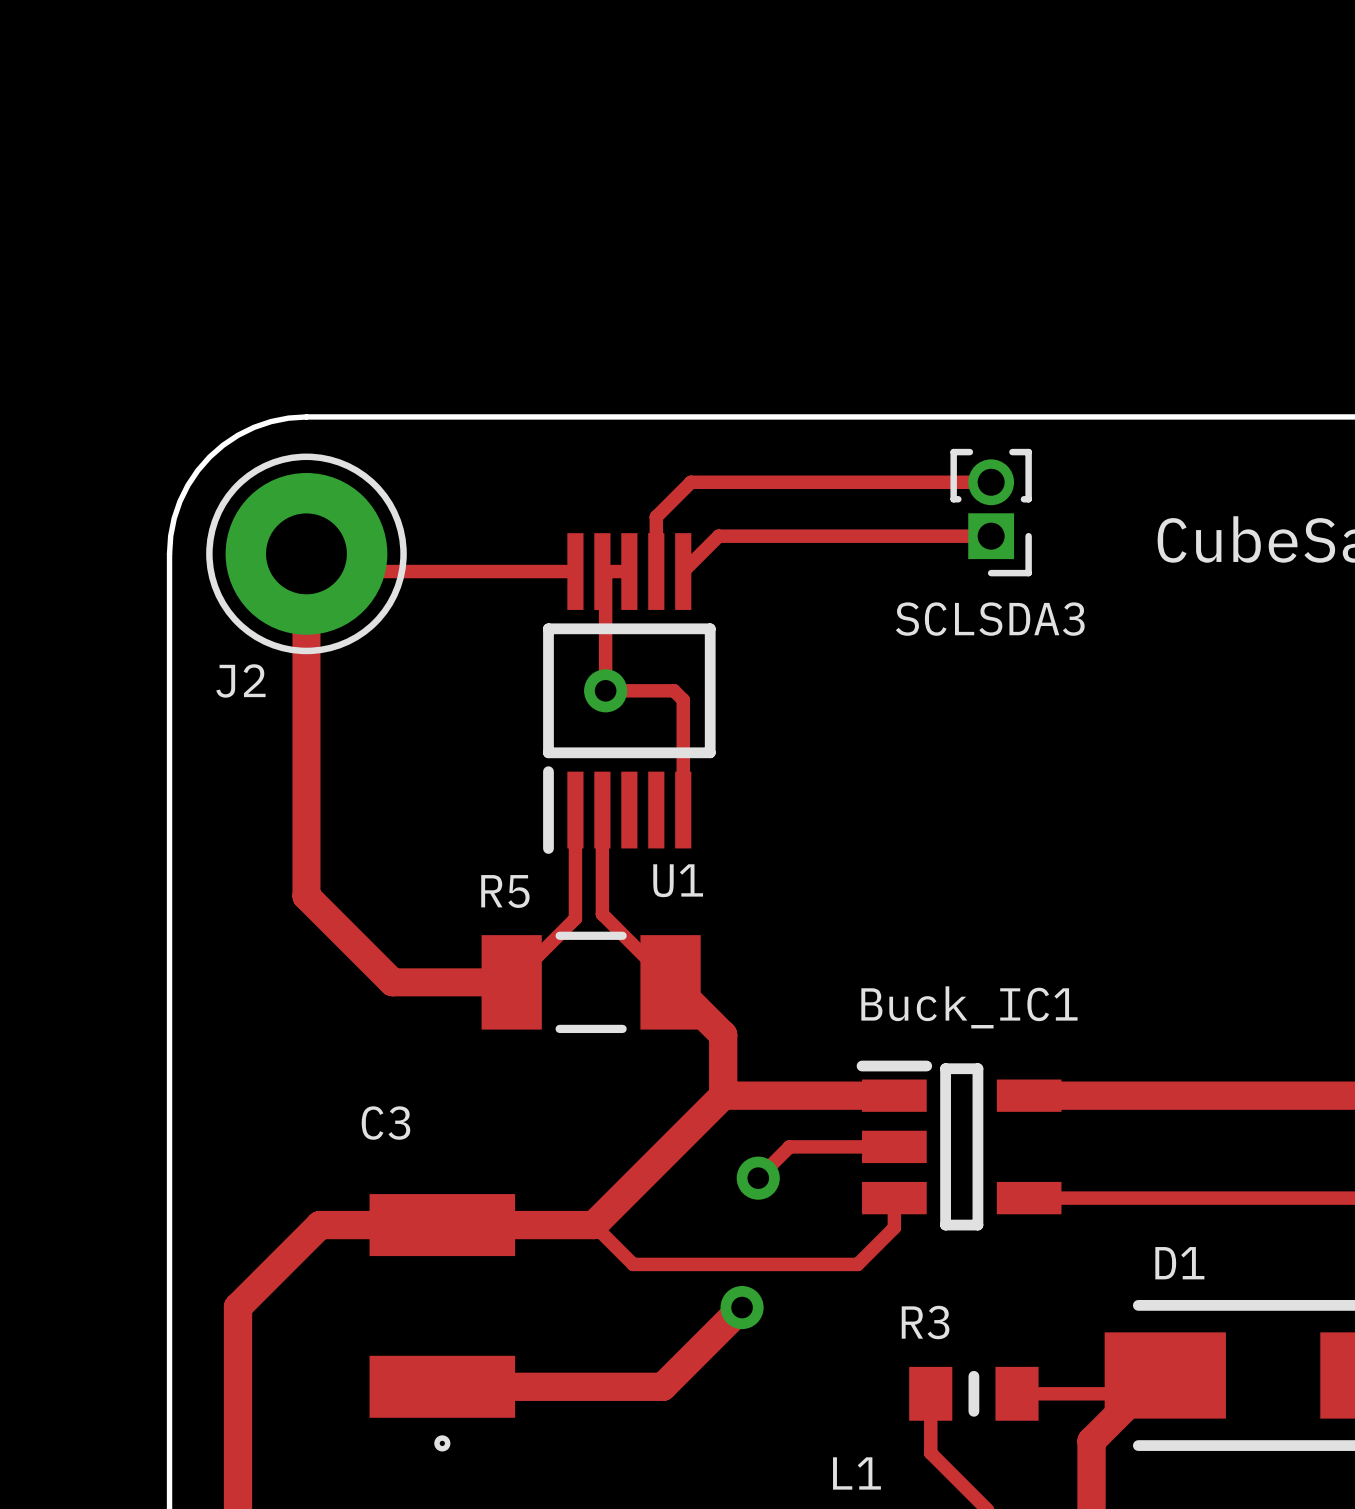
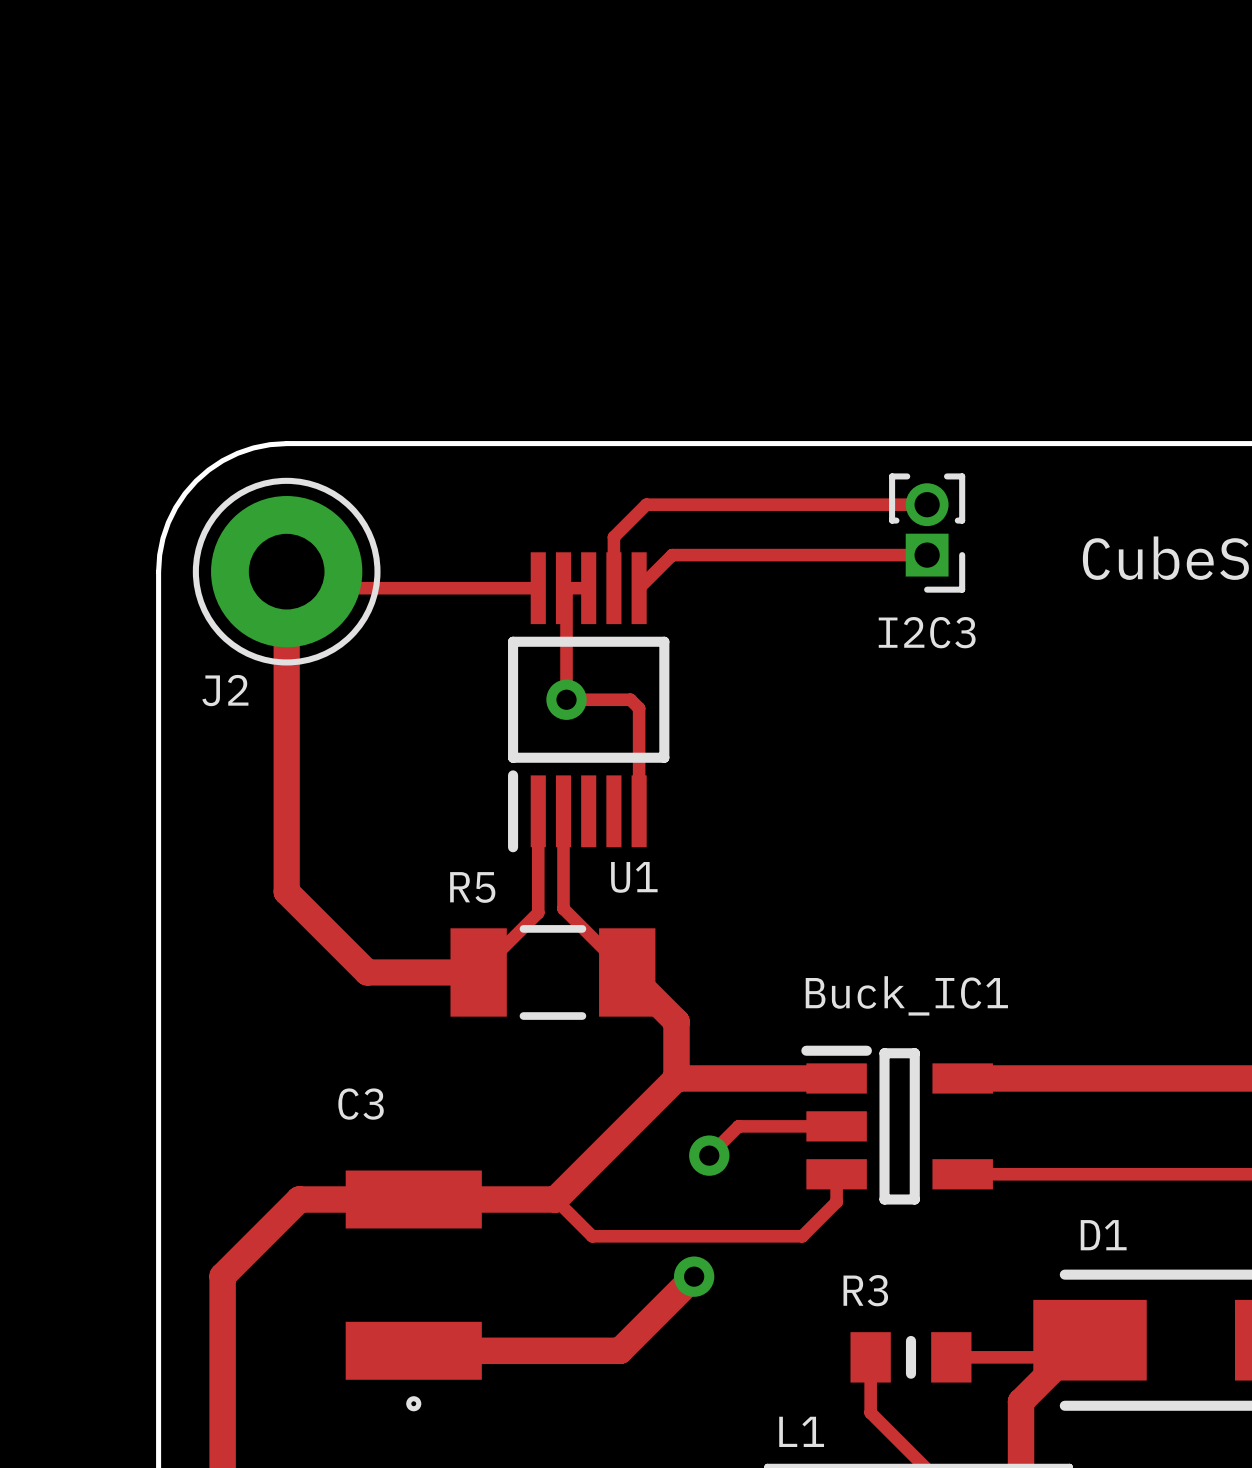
SCLSDA3 name: SCLSDA3 (990, 619) -> I2C3 (927, 632)

